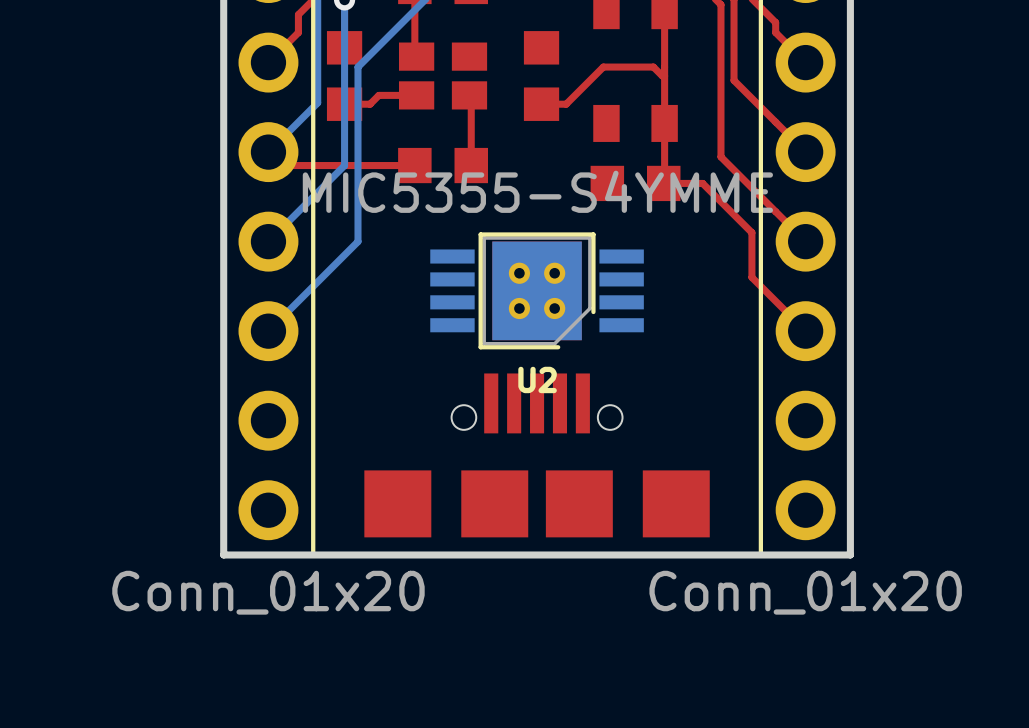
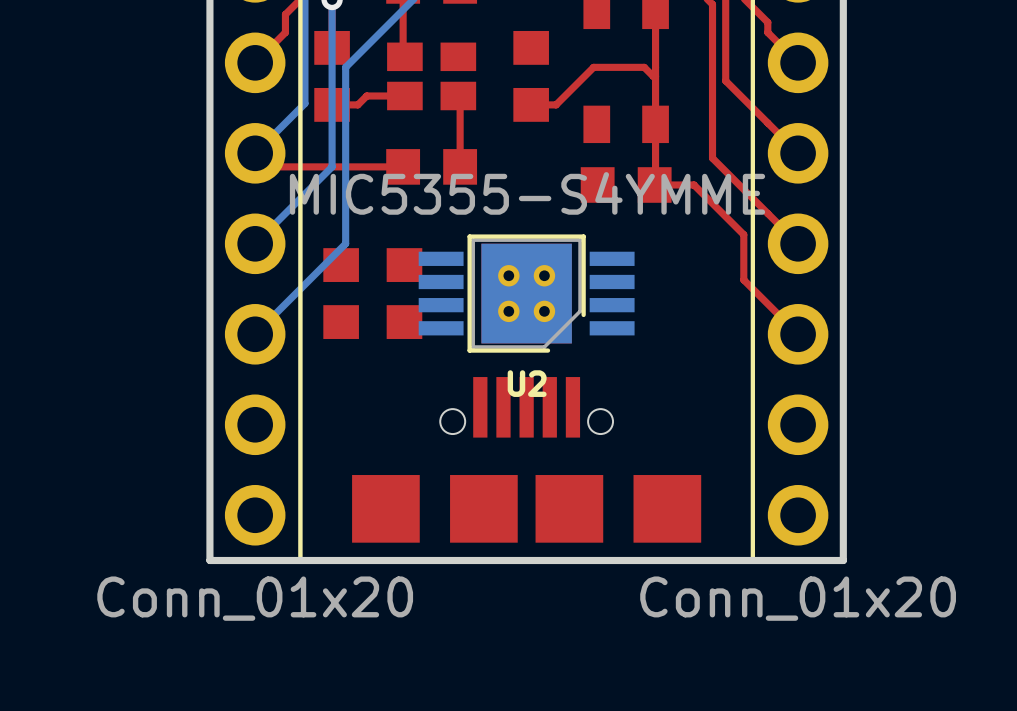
part: none -> (341, 293)
part: none -> (404, 293)

